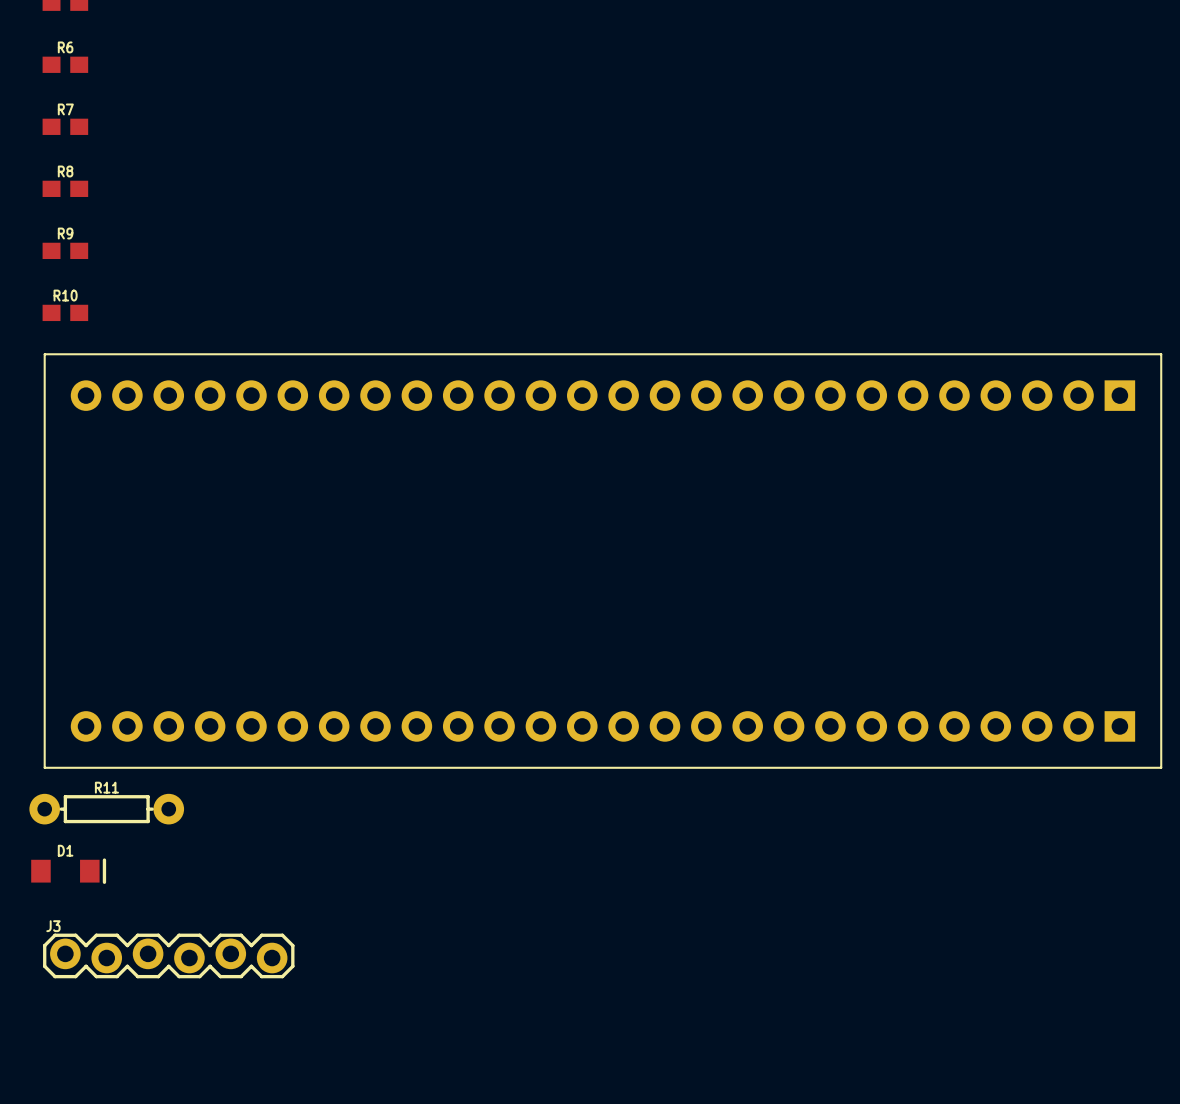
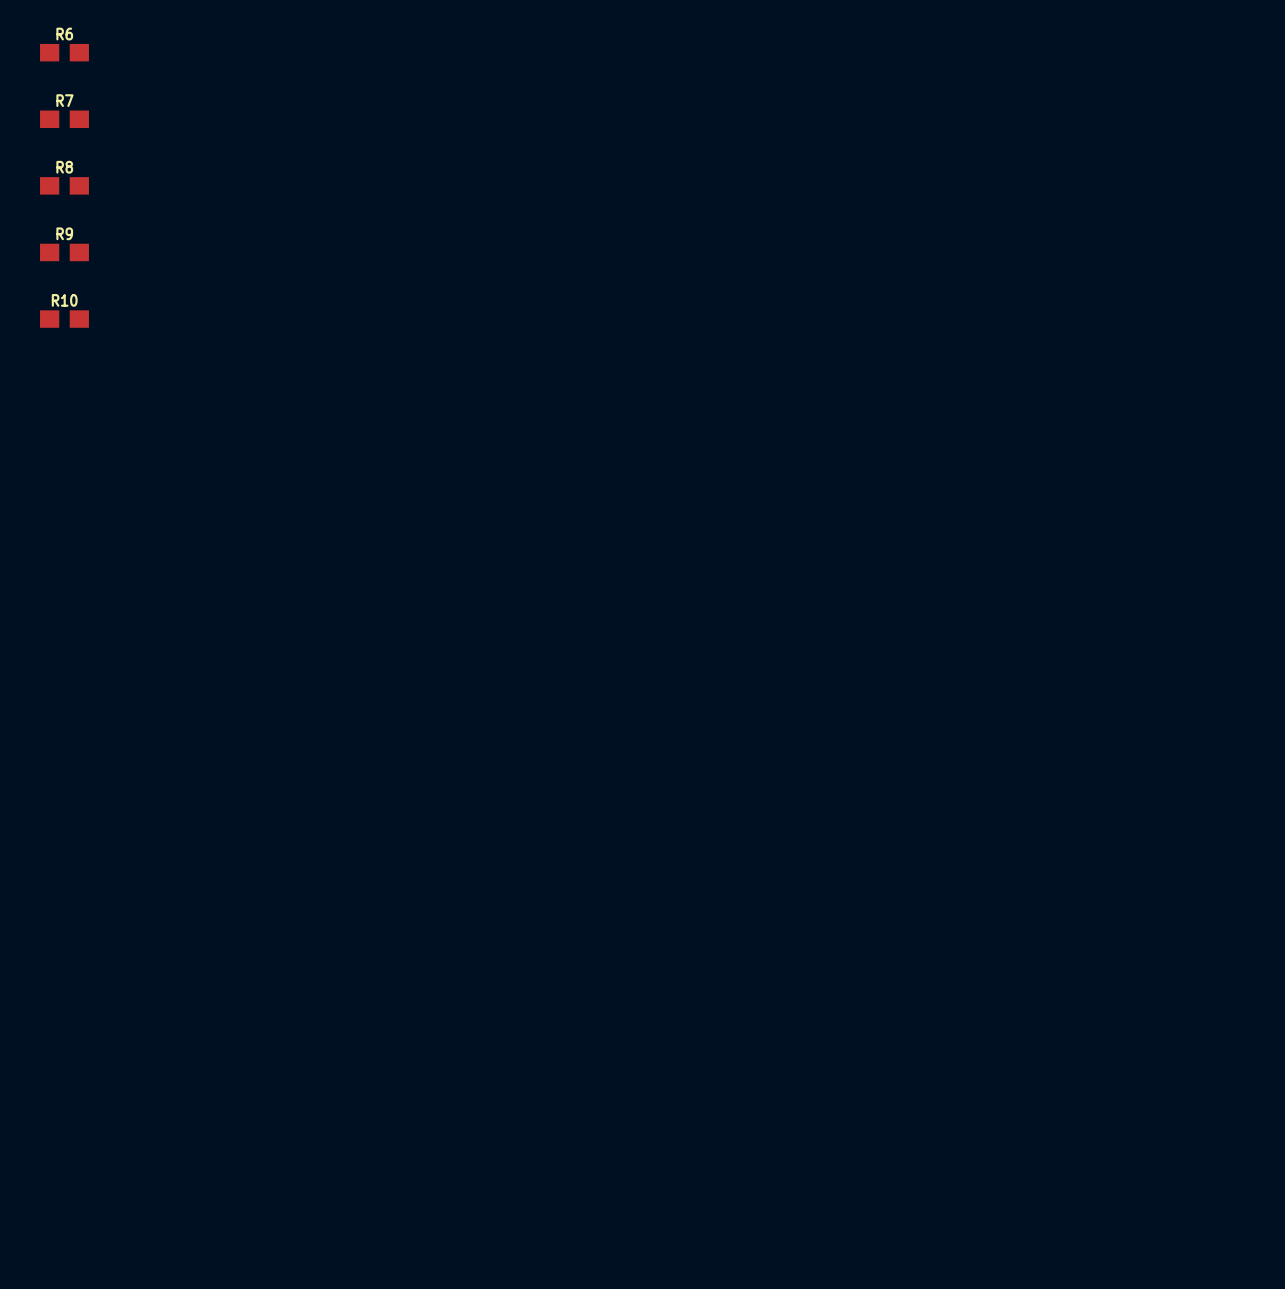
part: (602, 561) -> none
R11: (106, 809) -> none
D1: (68, 871) -> none
J3: (168, 955) -> none

